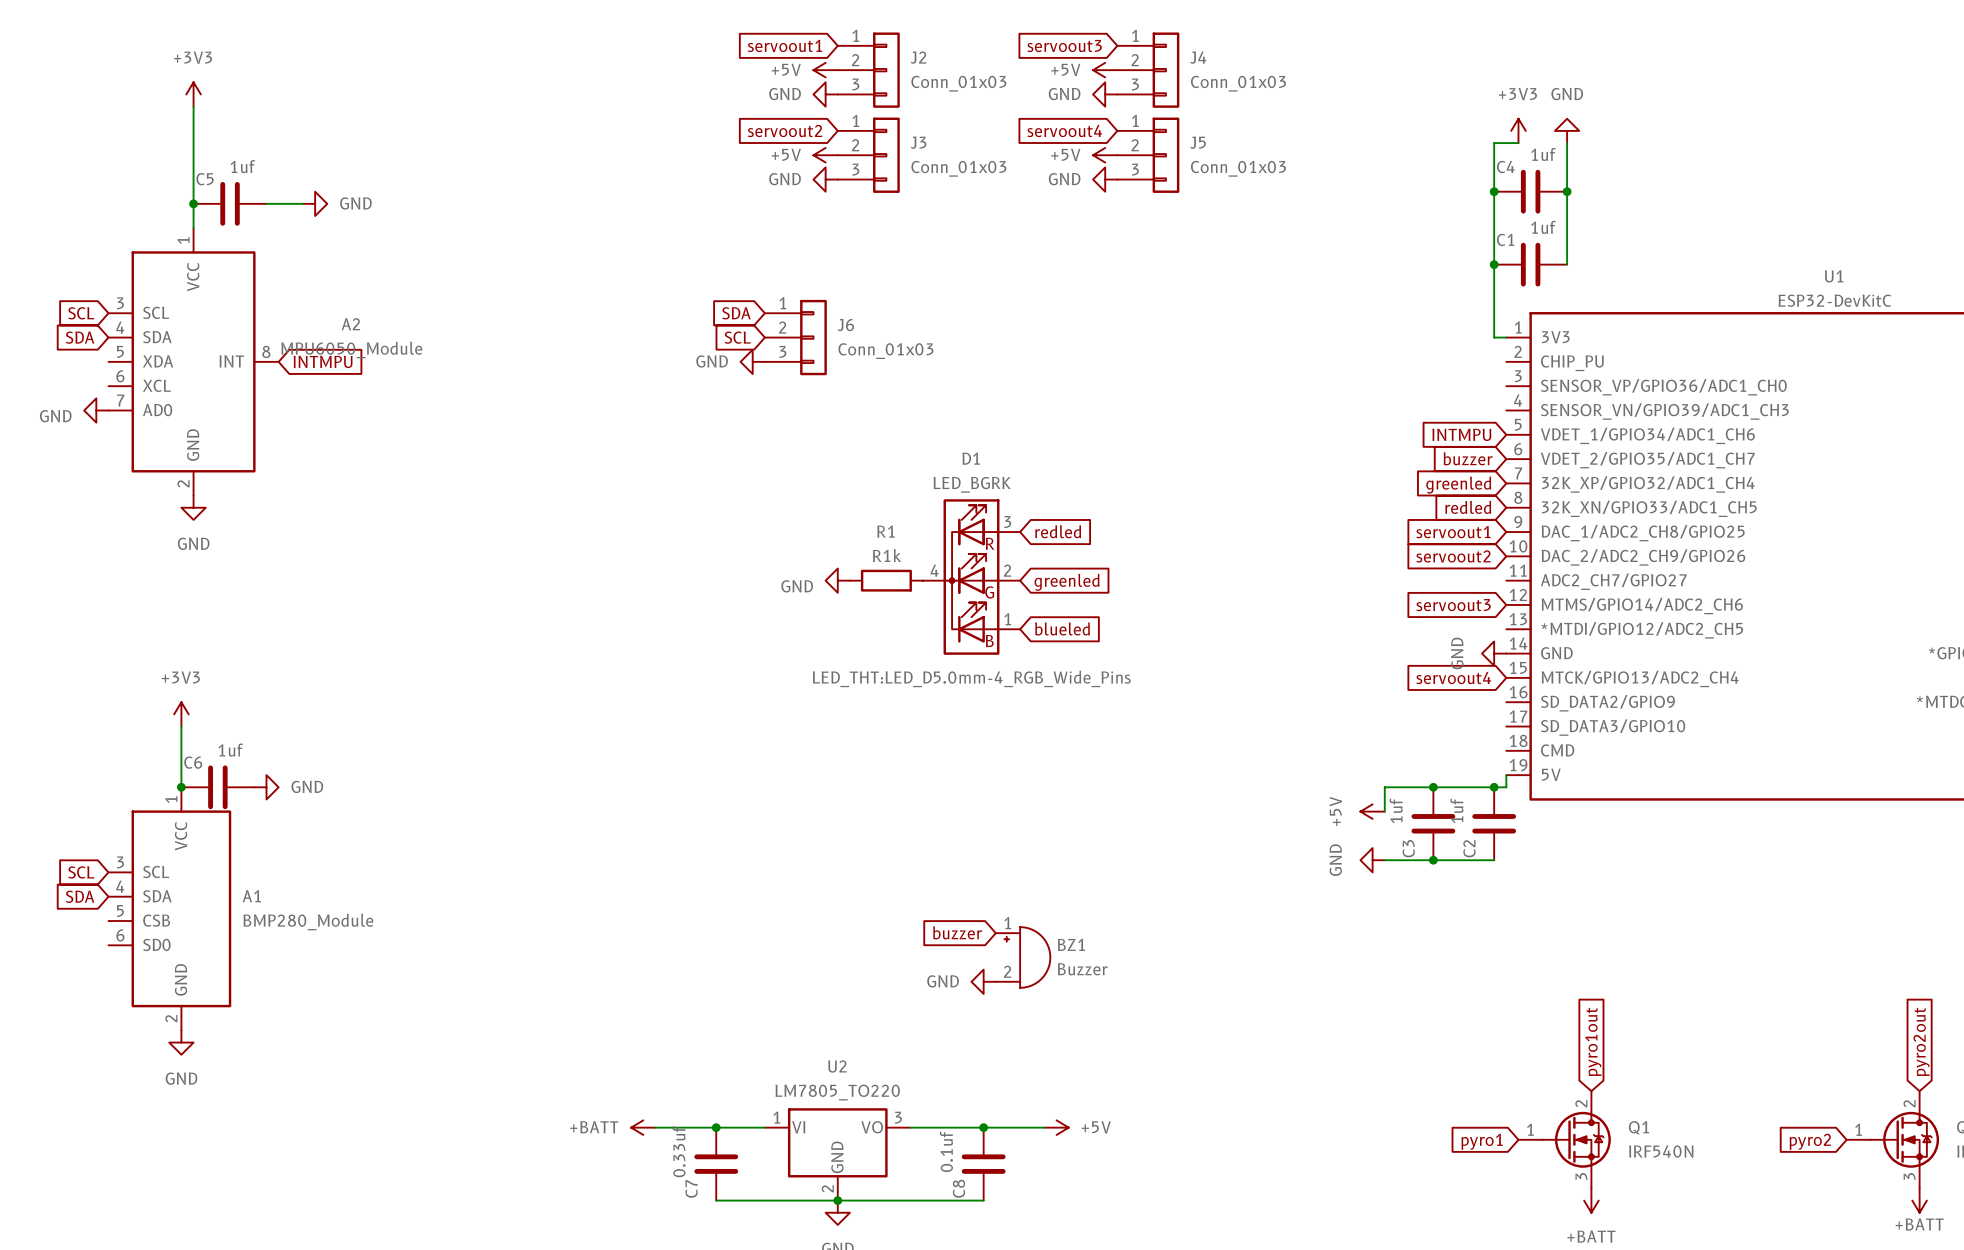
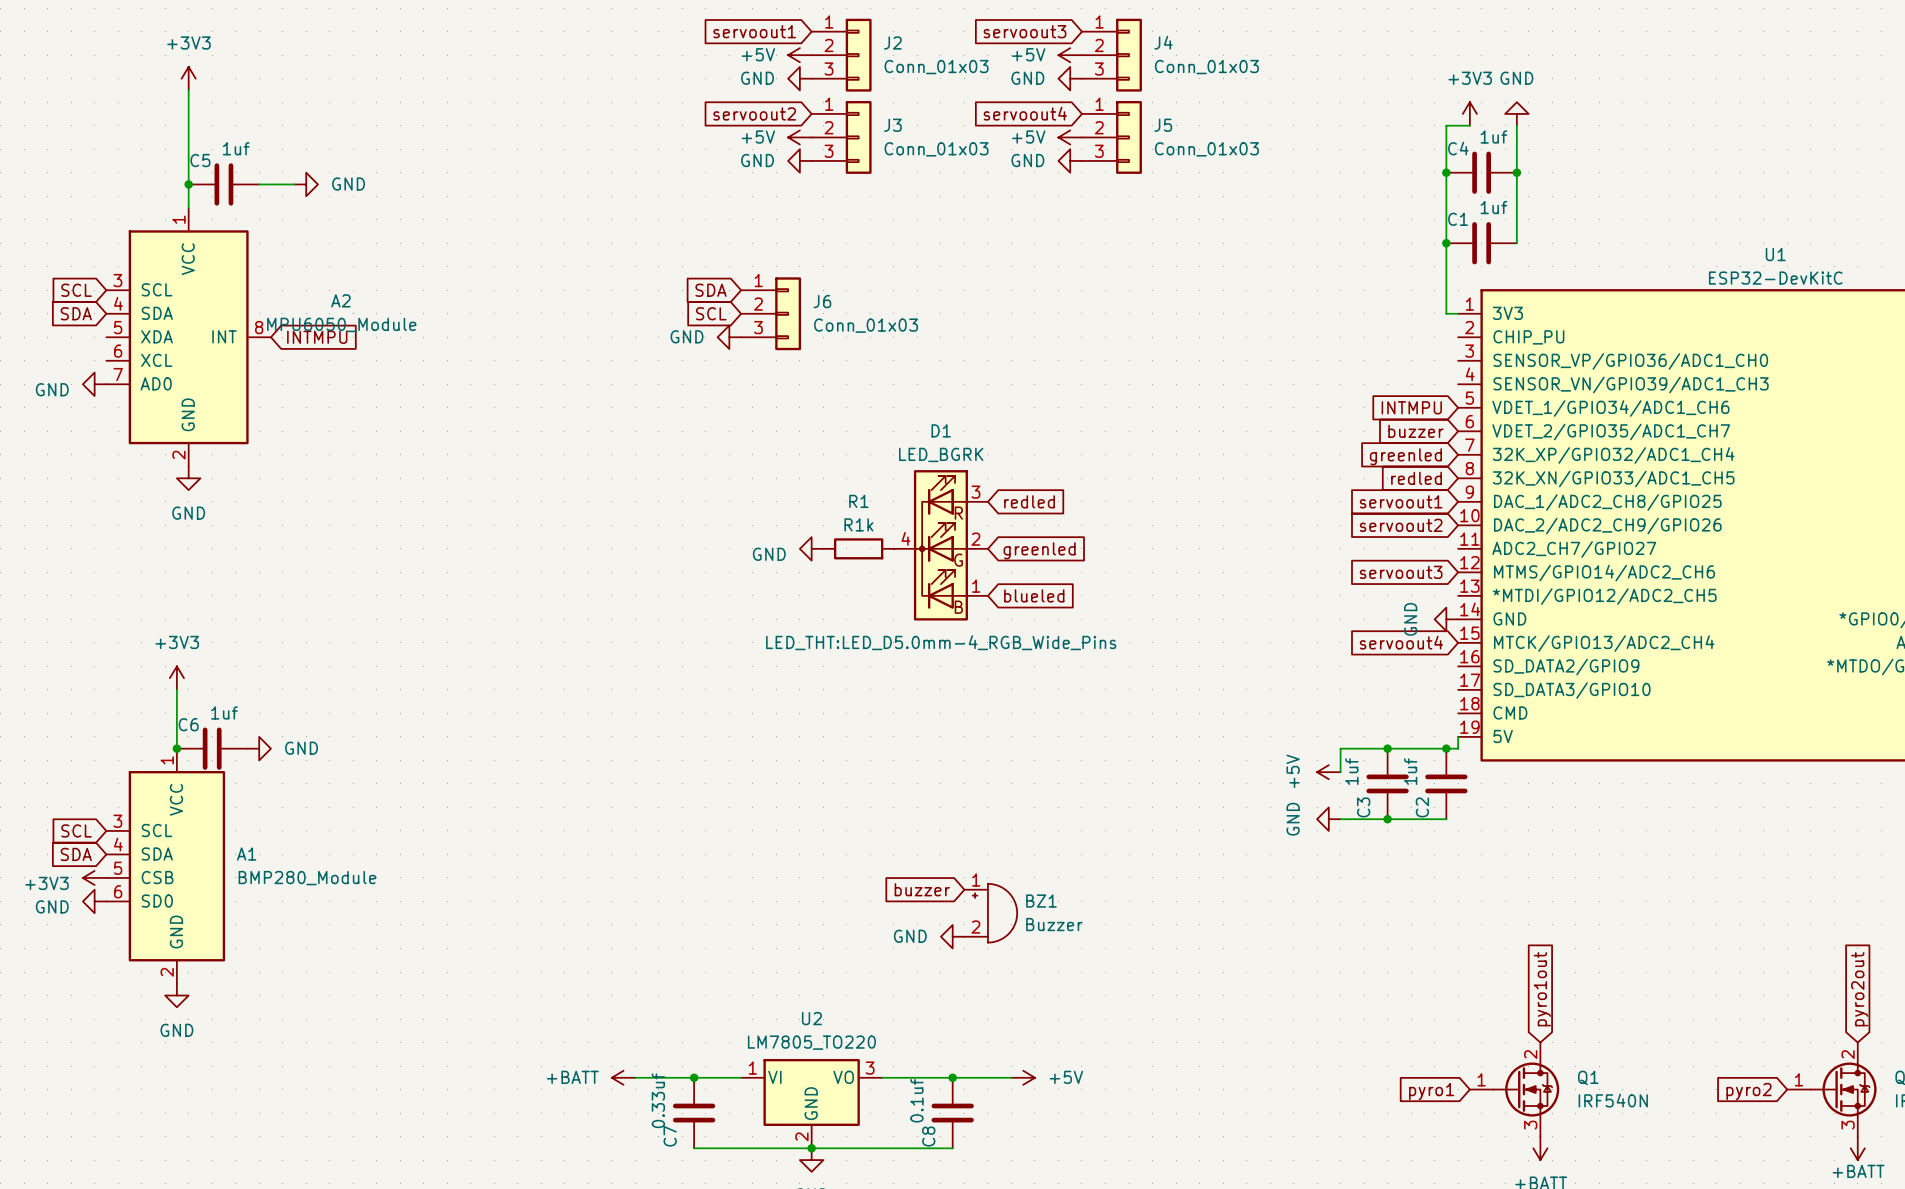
power symbol: none -> +3V3 (94, 877)
power symbol: none -> GND (94, 901)

